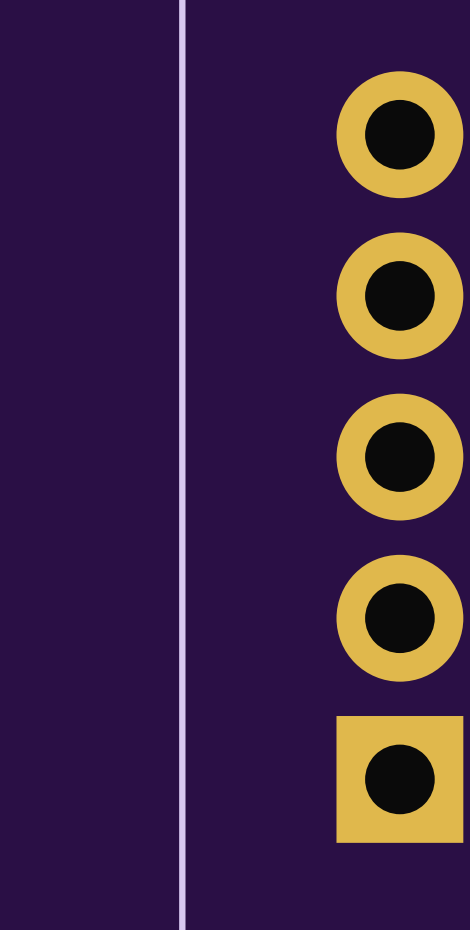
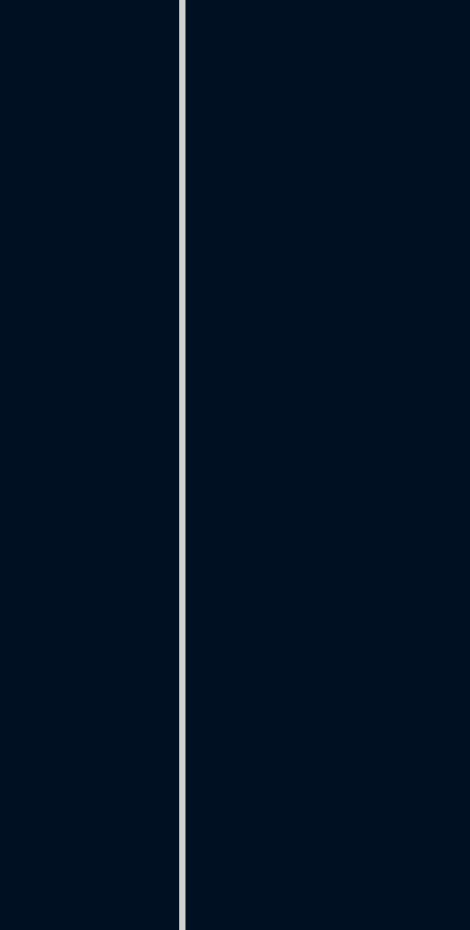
part: (399, 457) -> none

